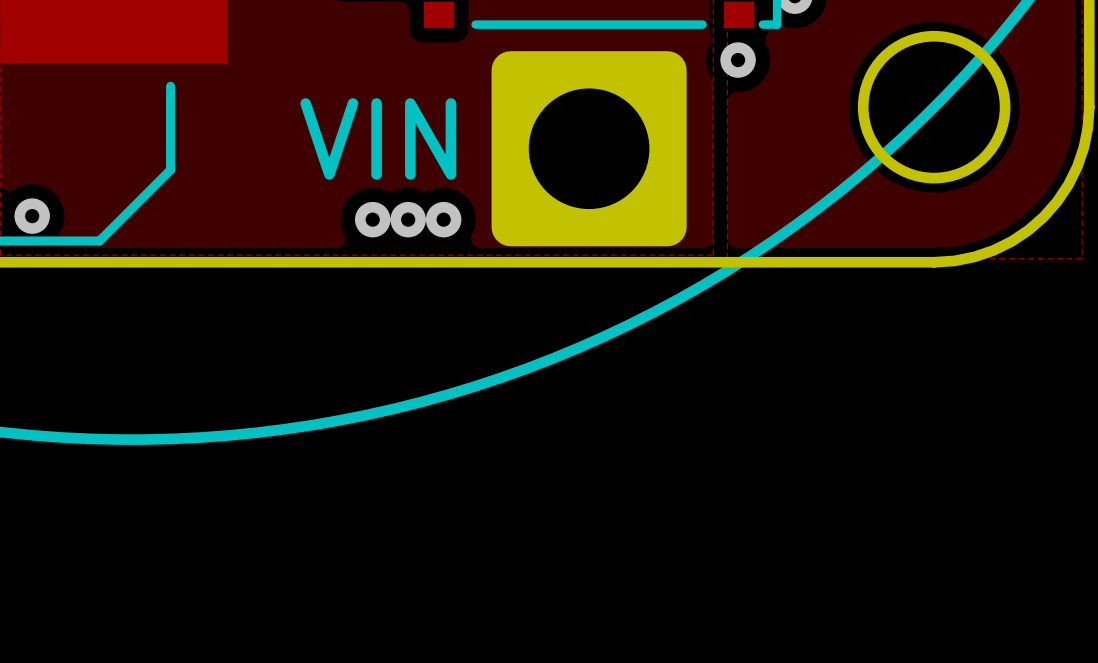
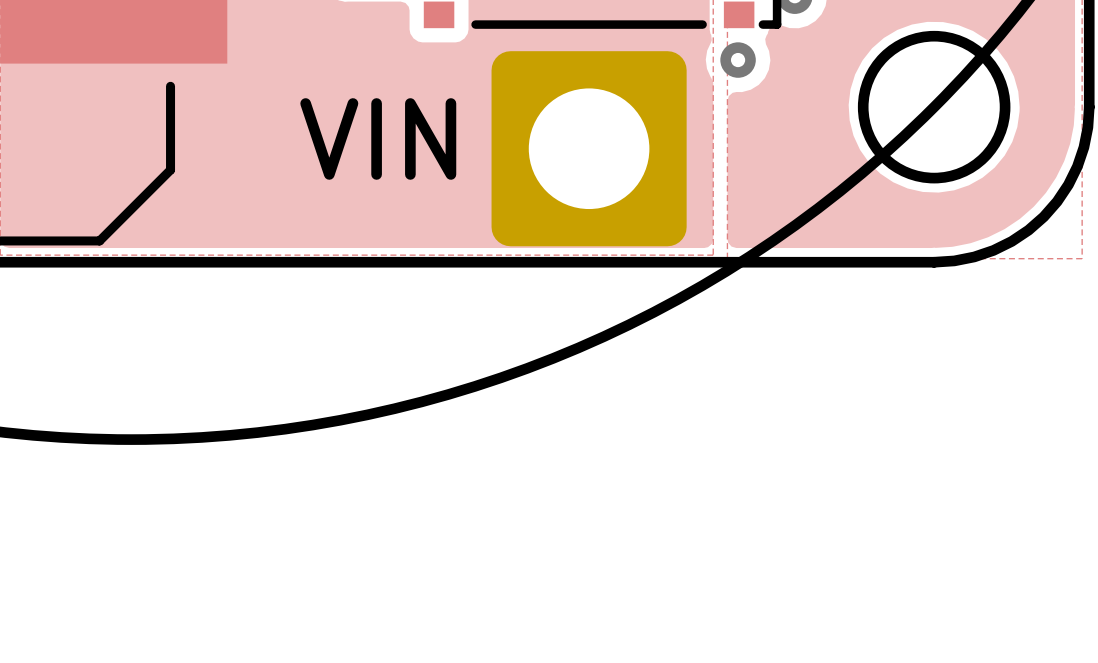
via: (32, 216) -> none
via: (372, 219) -> none
via: (408, 219) -> none
via: (443, 219) -> none

